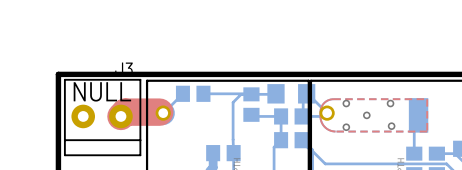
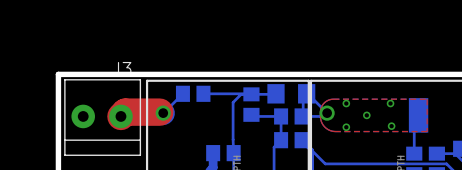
text: NULL (102, 91) -> none

